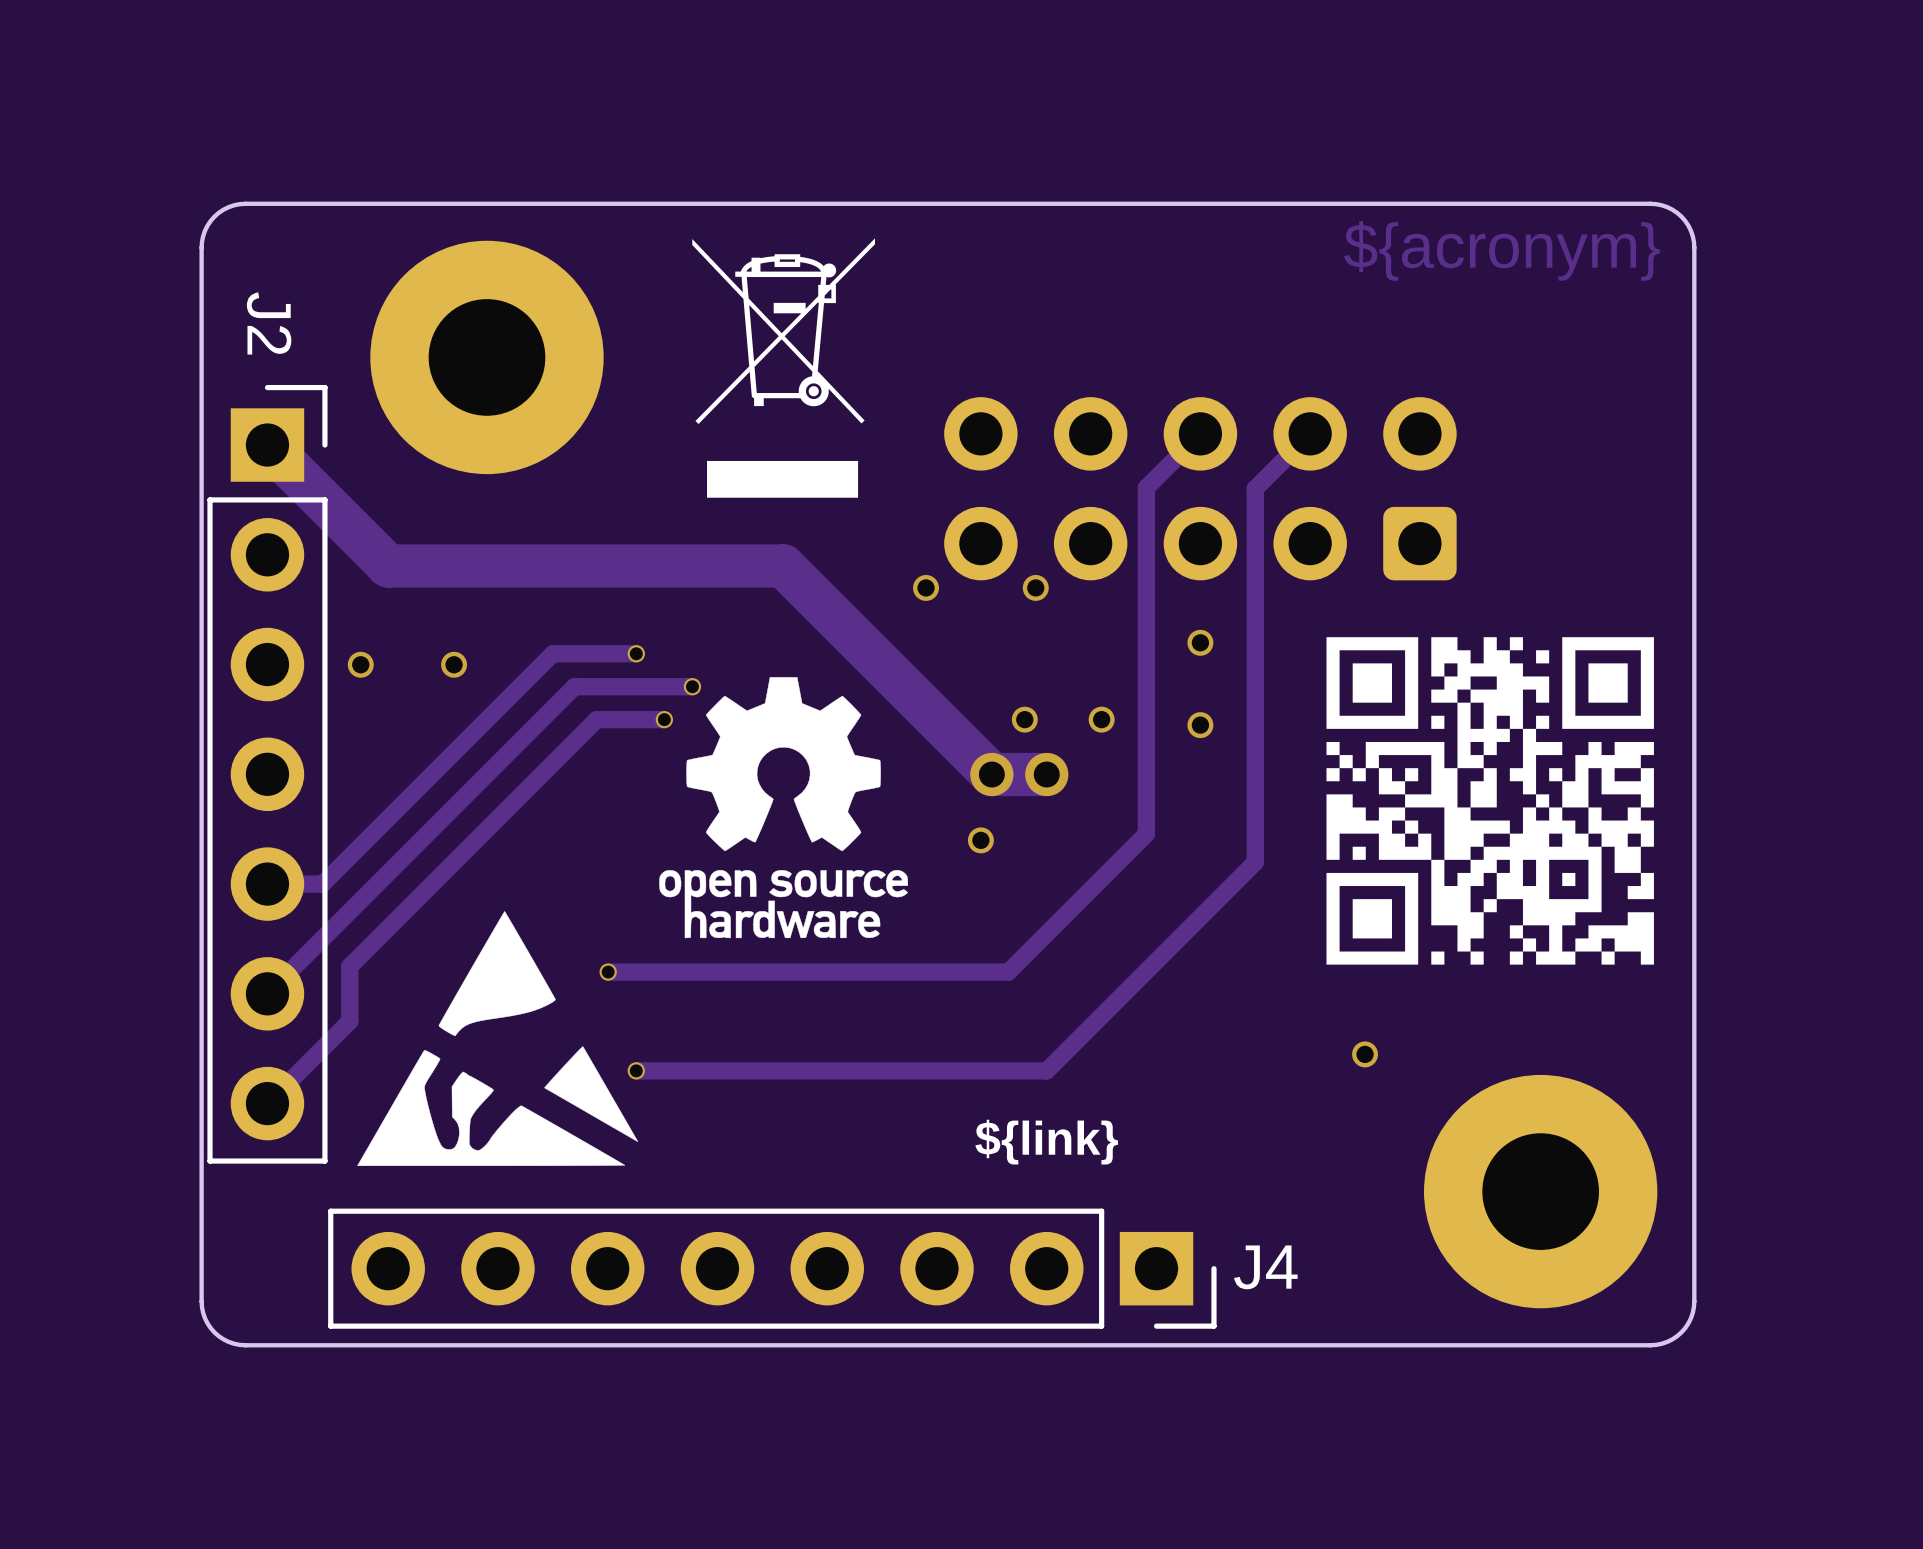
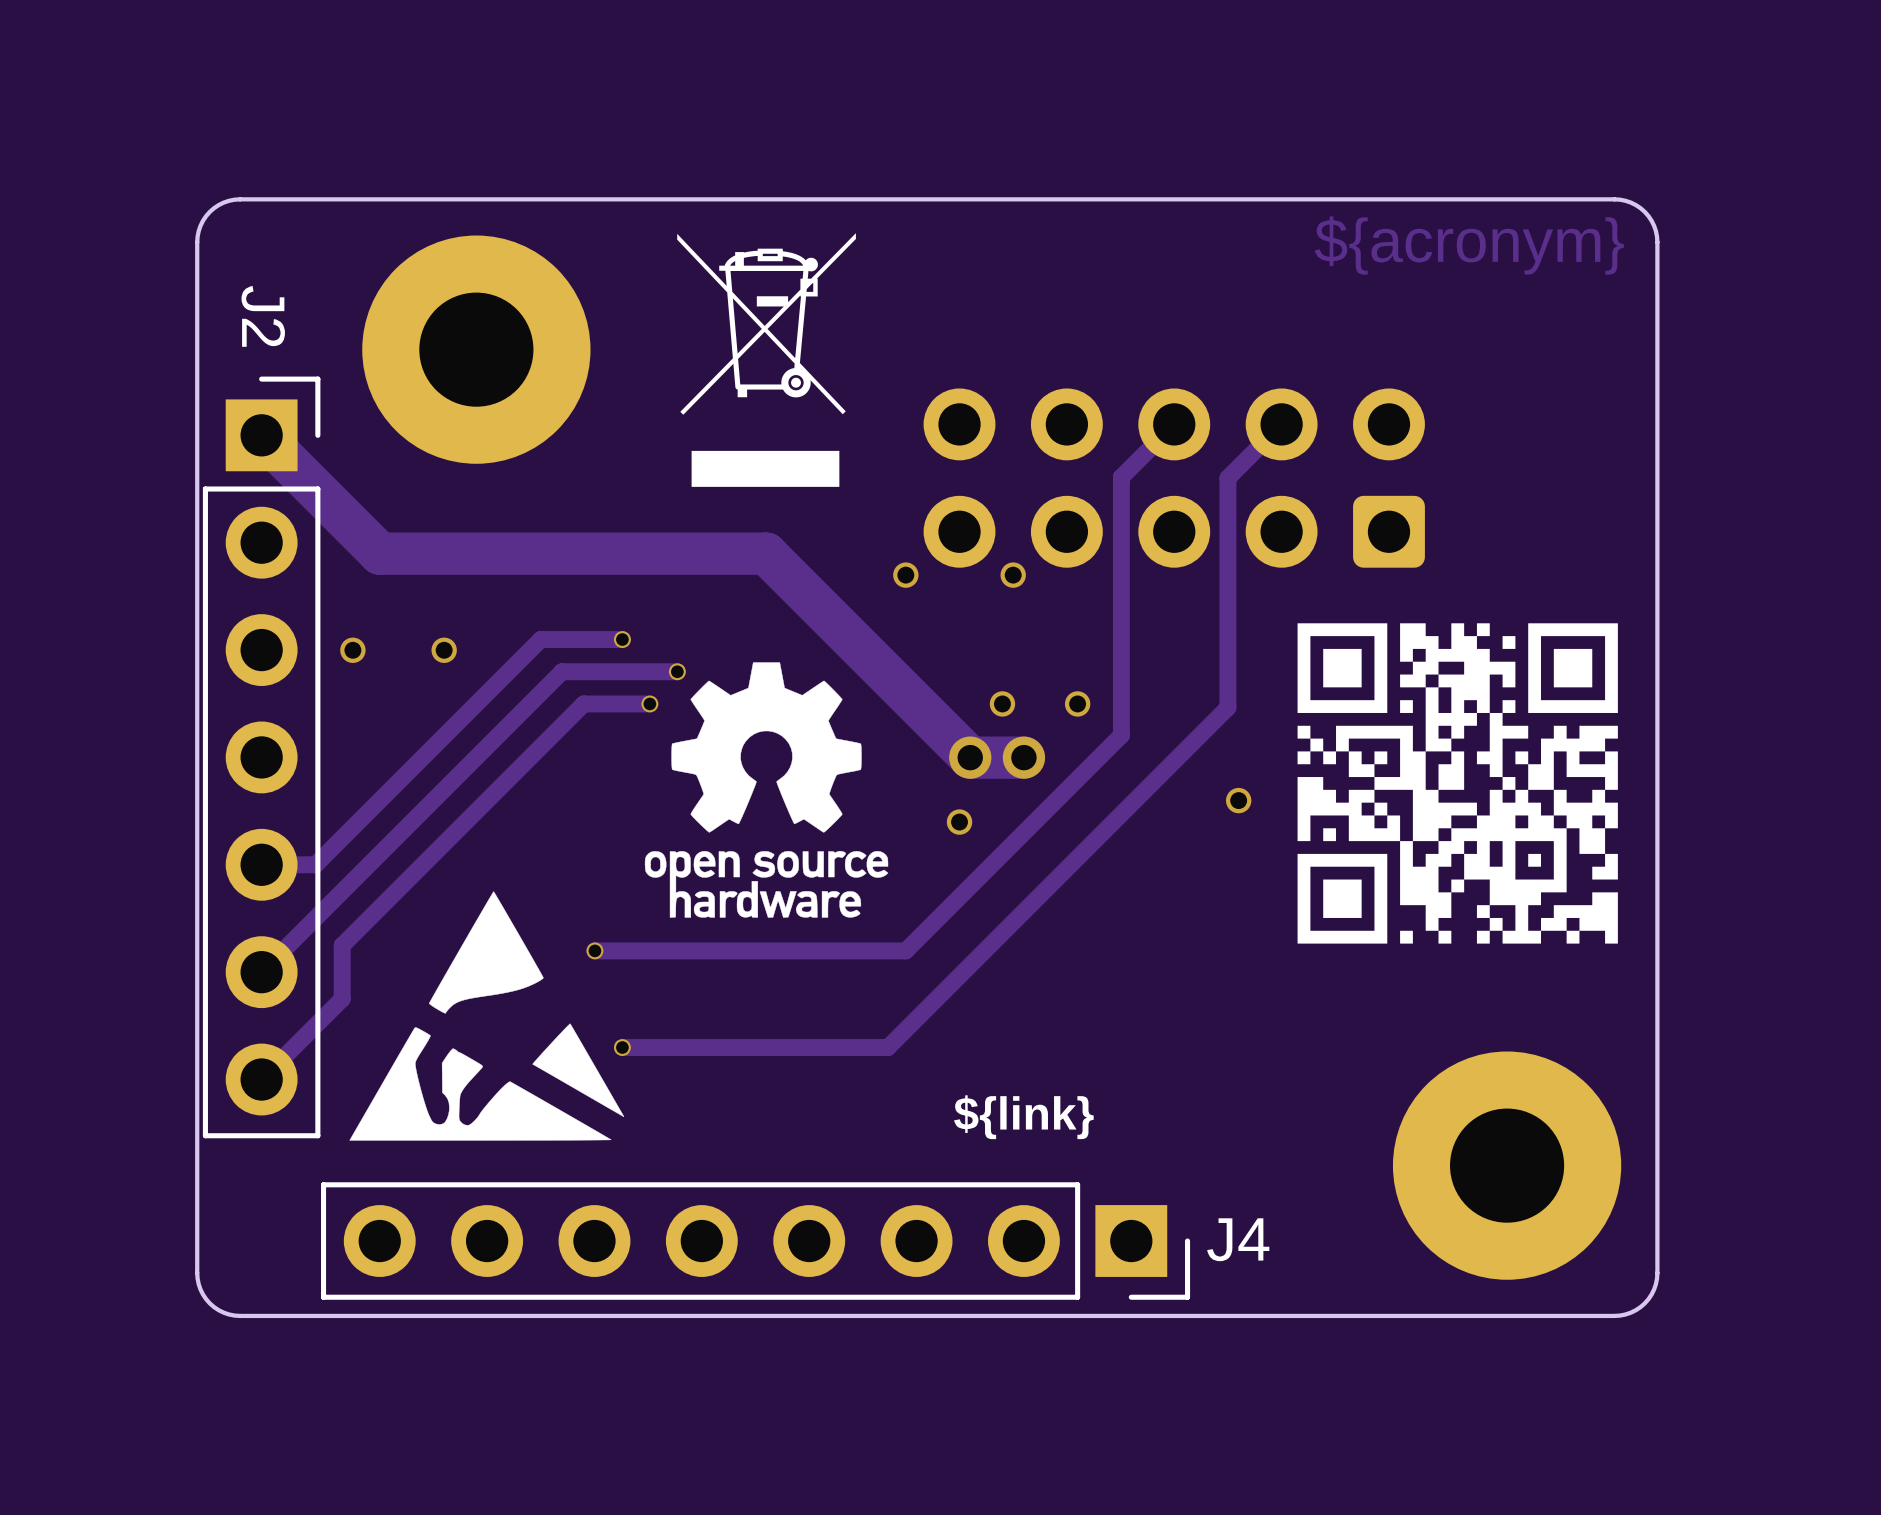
via: (1200, 642) -> none
track: (1255, 723) (1255, 862) (1046, 1070) (907, 1070) -> (1227, 707) (888, 1047)
via: (1200, 725) -> none
track: (1146, 751) (1146, 834) (1008, 972) (926, 972) -> (1121, 735) (905, 950)
via: none -> (1238, 800)
via: (1365, 1054) -> none

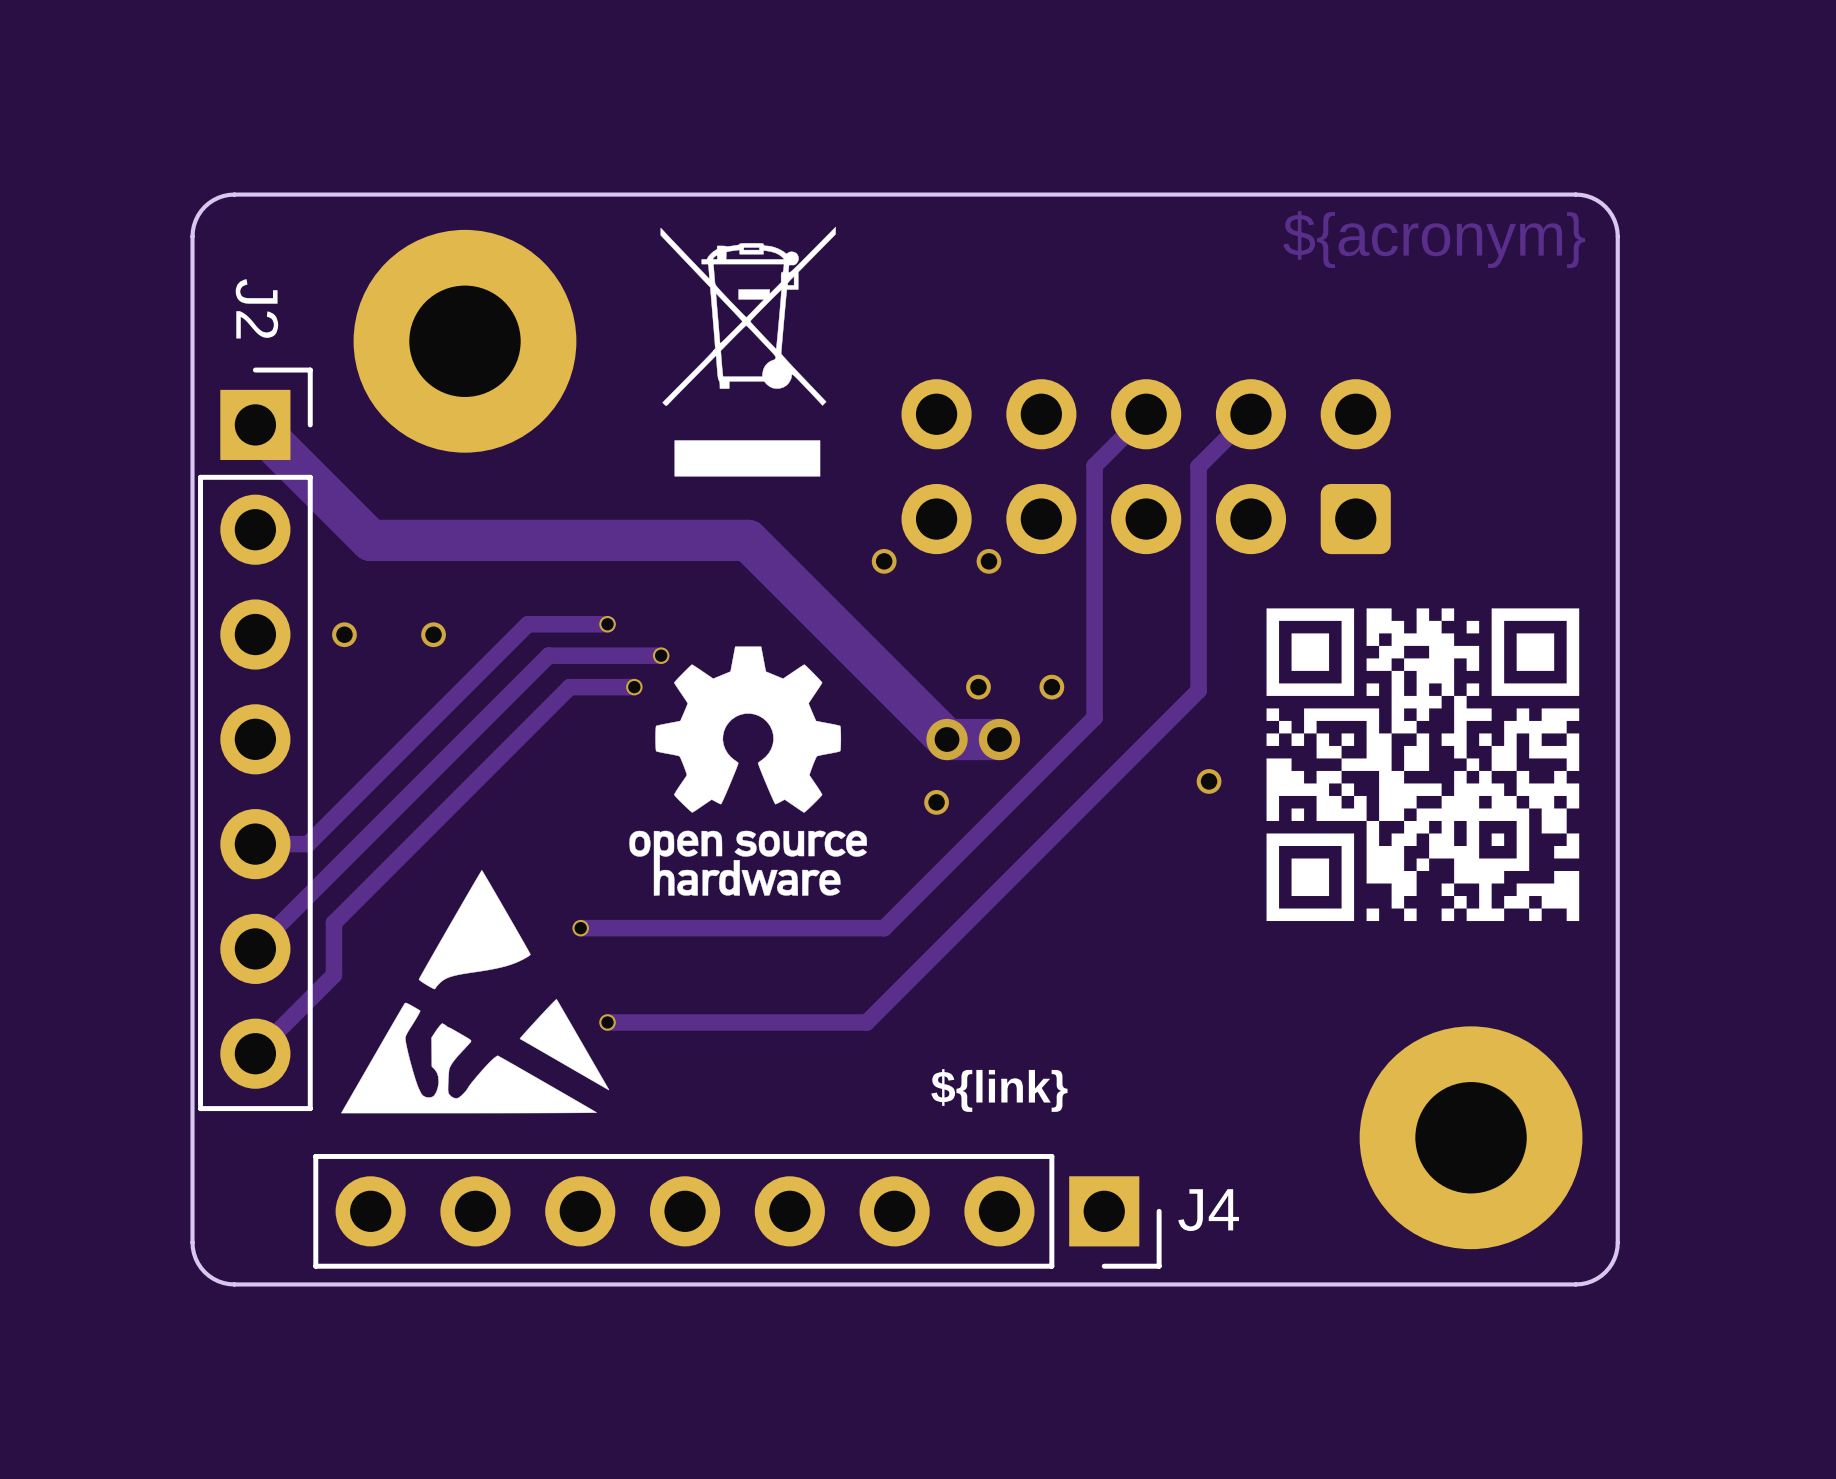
drawing shape: [677, 233, 856, 487] -> [660, 226, 836, 477]

